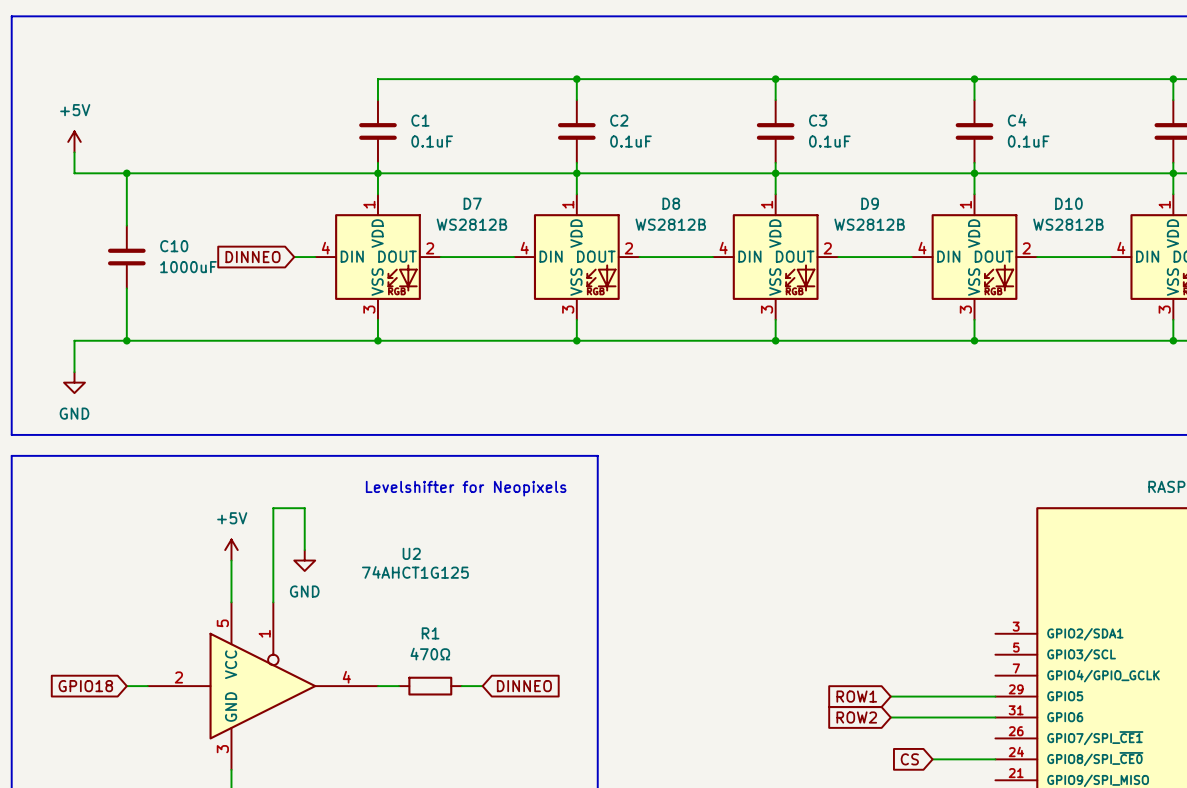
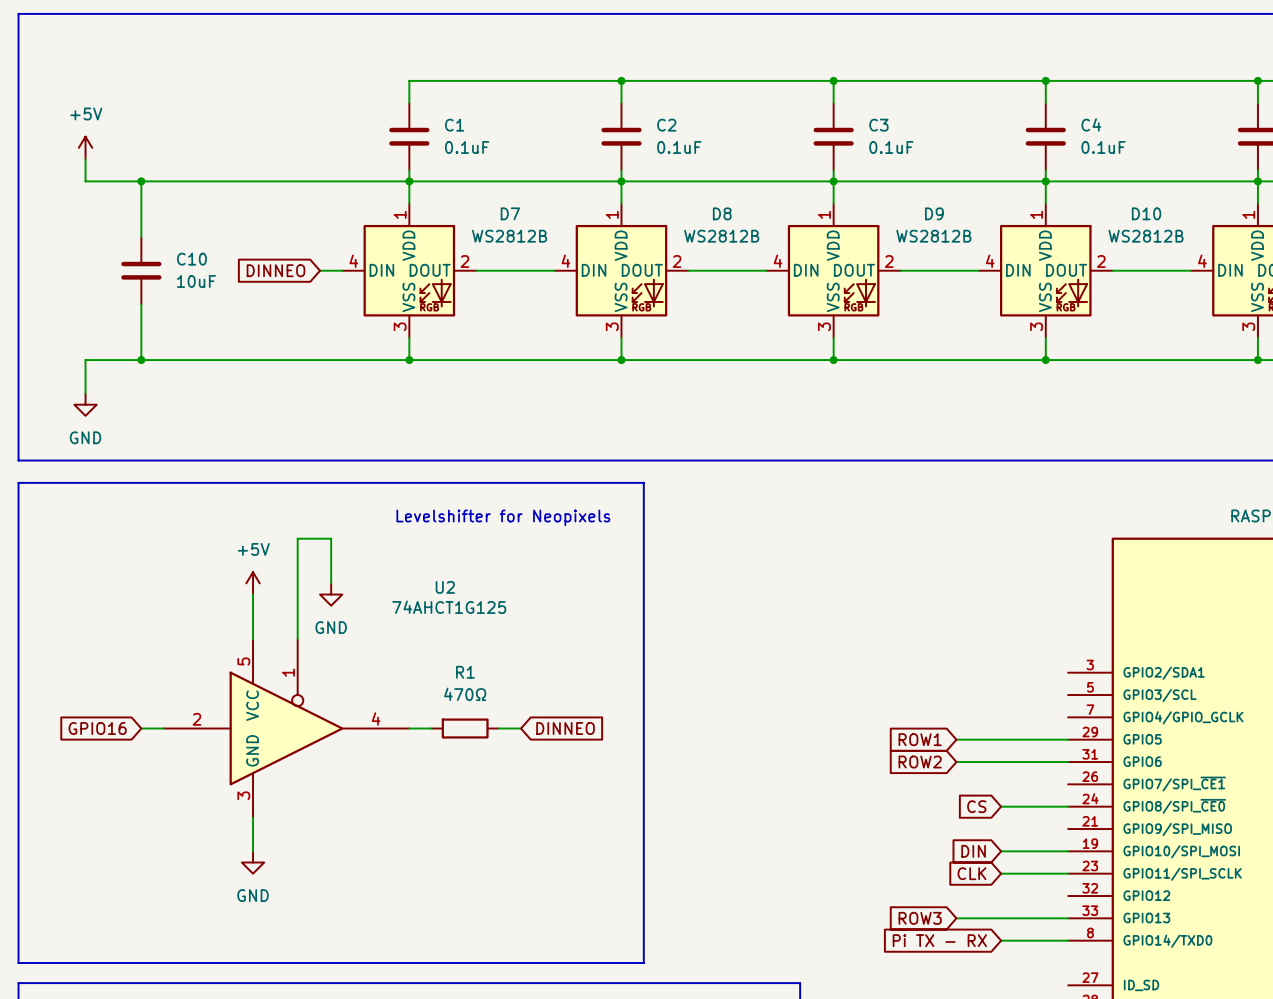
C10 value: 1000uF (188, 267) -> 10uF (196, 281)
global label: GPIO18 (85, 686) -> GPIO16 (97, 728)

